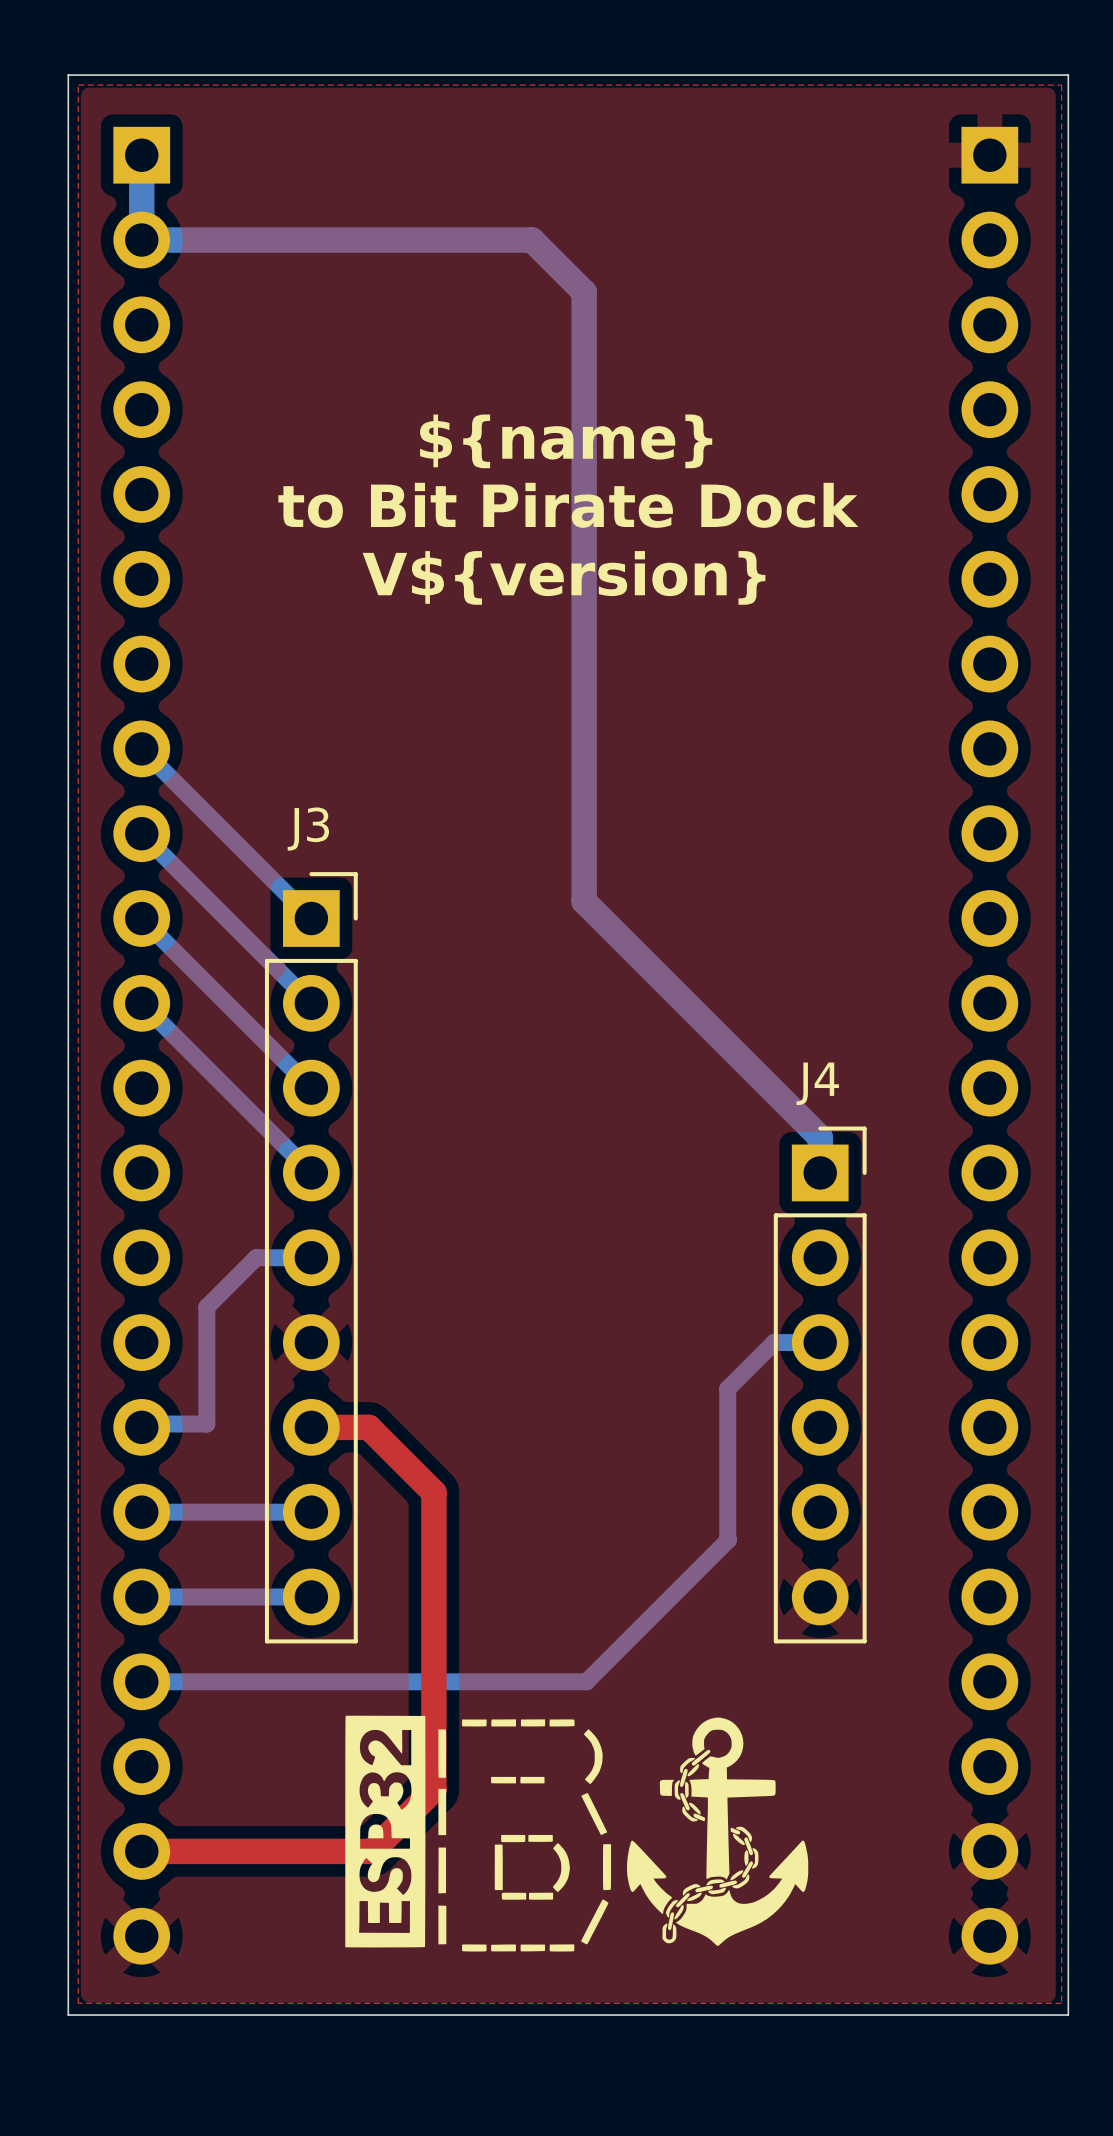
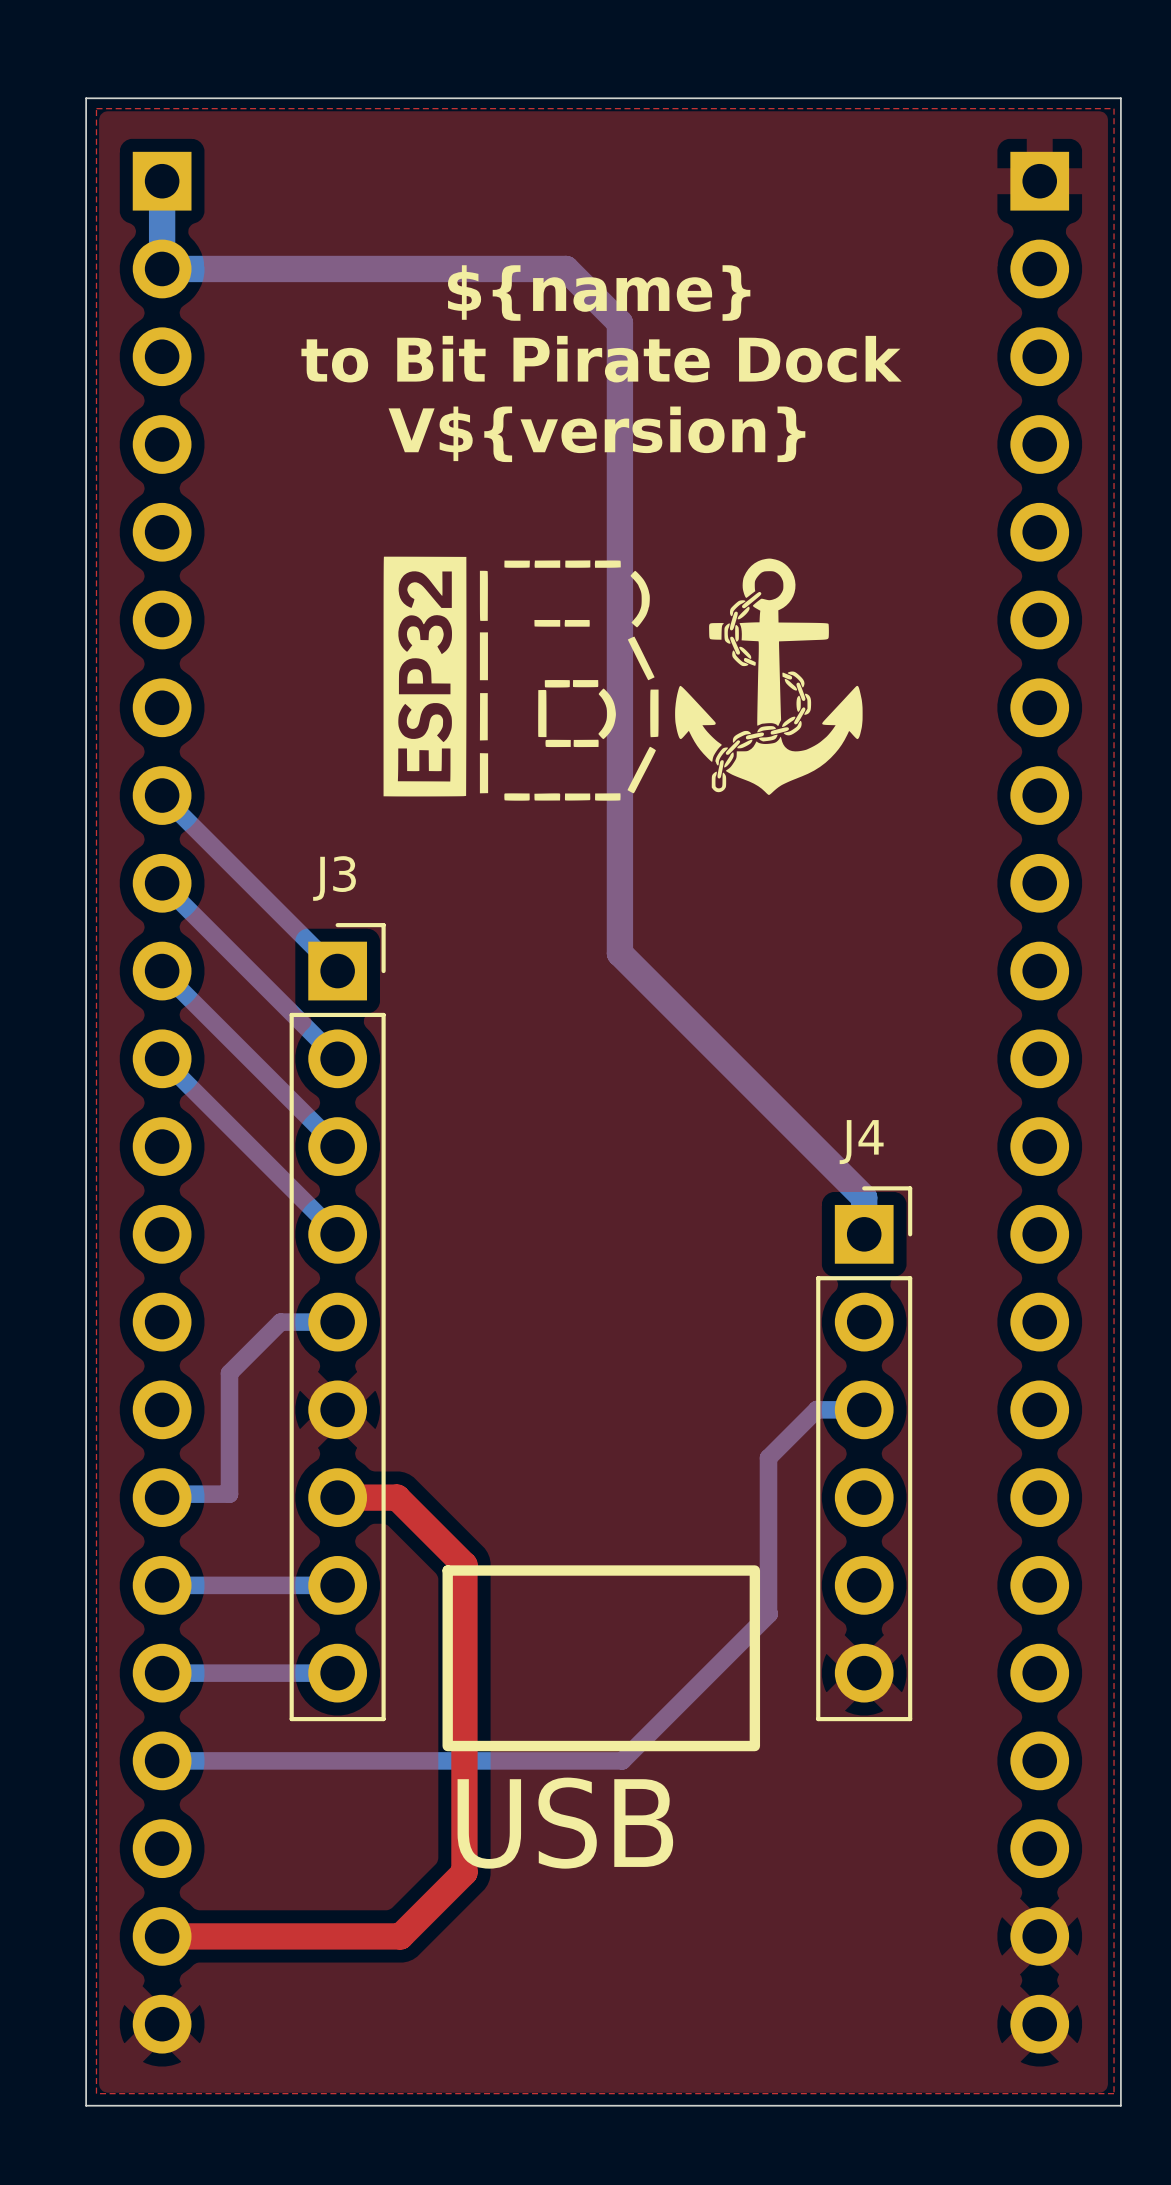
text position: ${name} (566, 441) -> ${name} (599, 293)
text position: to Bit Pirate Dock (568, 505) -> to Bit Pirate Dock (601, 359)
drawing: none -> [383, 556, 863, 801]
text position: V${version} (564, 577) -> V${version} (596, 434)
drawing: none -> [442, 1565, 761, 1752]
drawing: [345, 1715, 809, 1952] -> none

